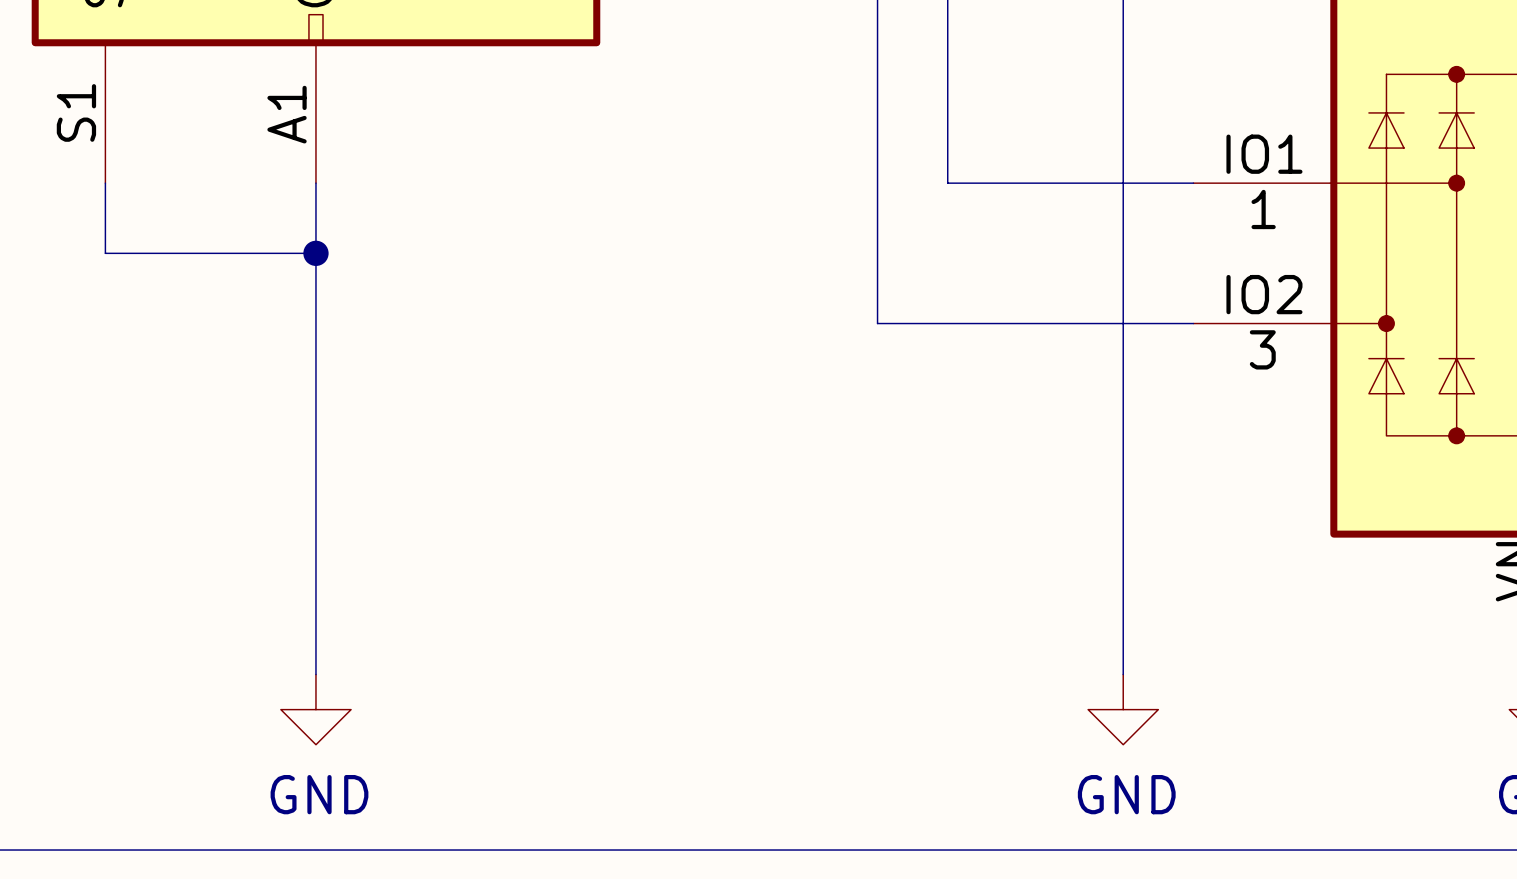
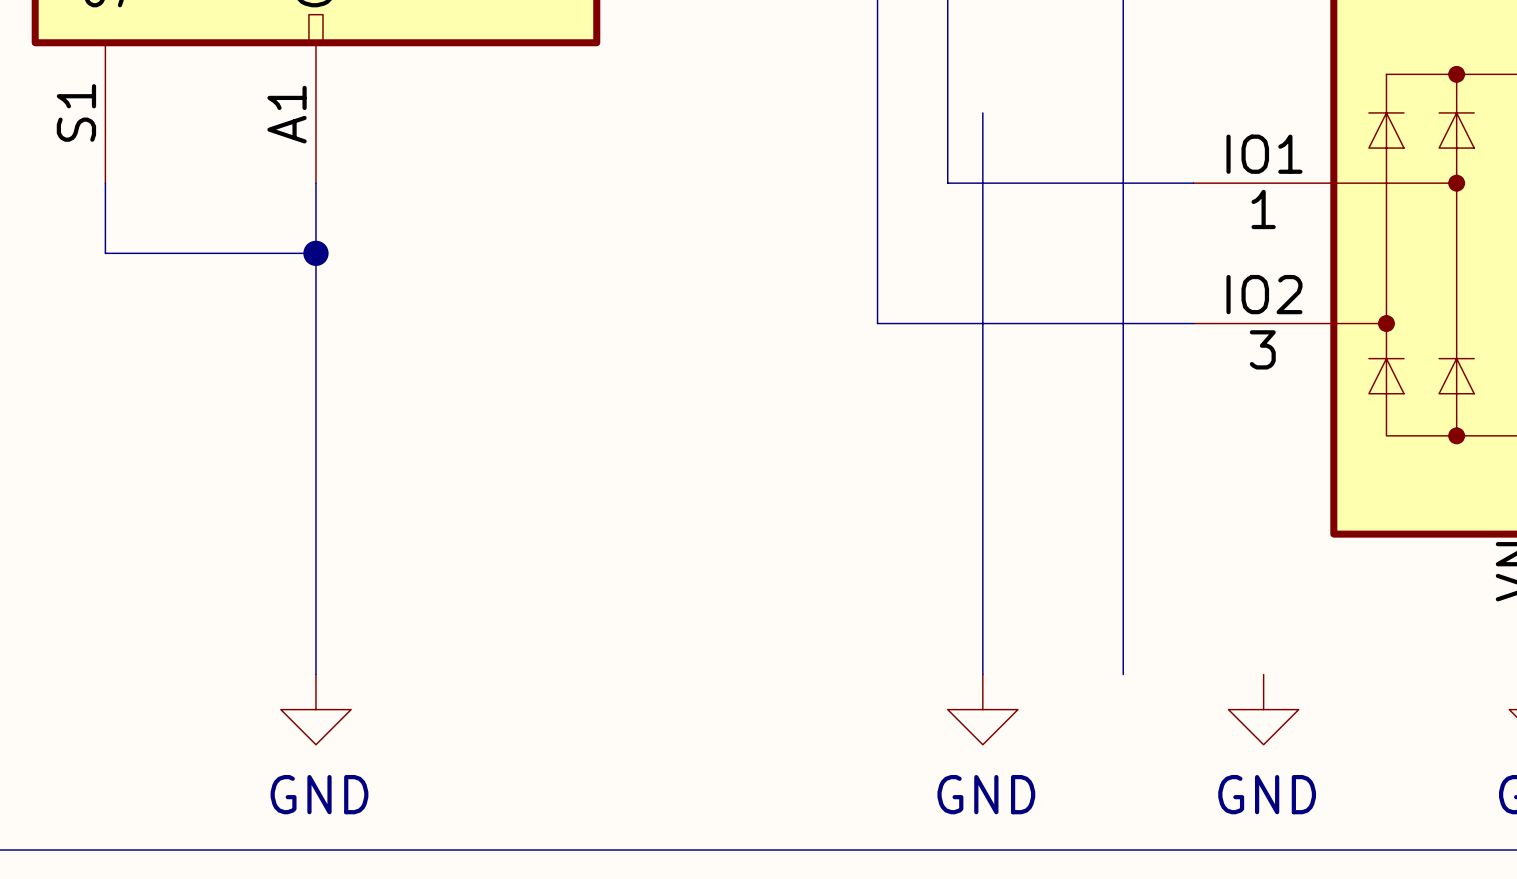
wire: none -> (982, 112) (982, 674)
power symbol: none -> GND (982, 709)
power symbol: GND (1123, 709) -> none
power symbol: none -> GND (1263, 709)

